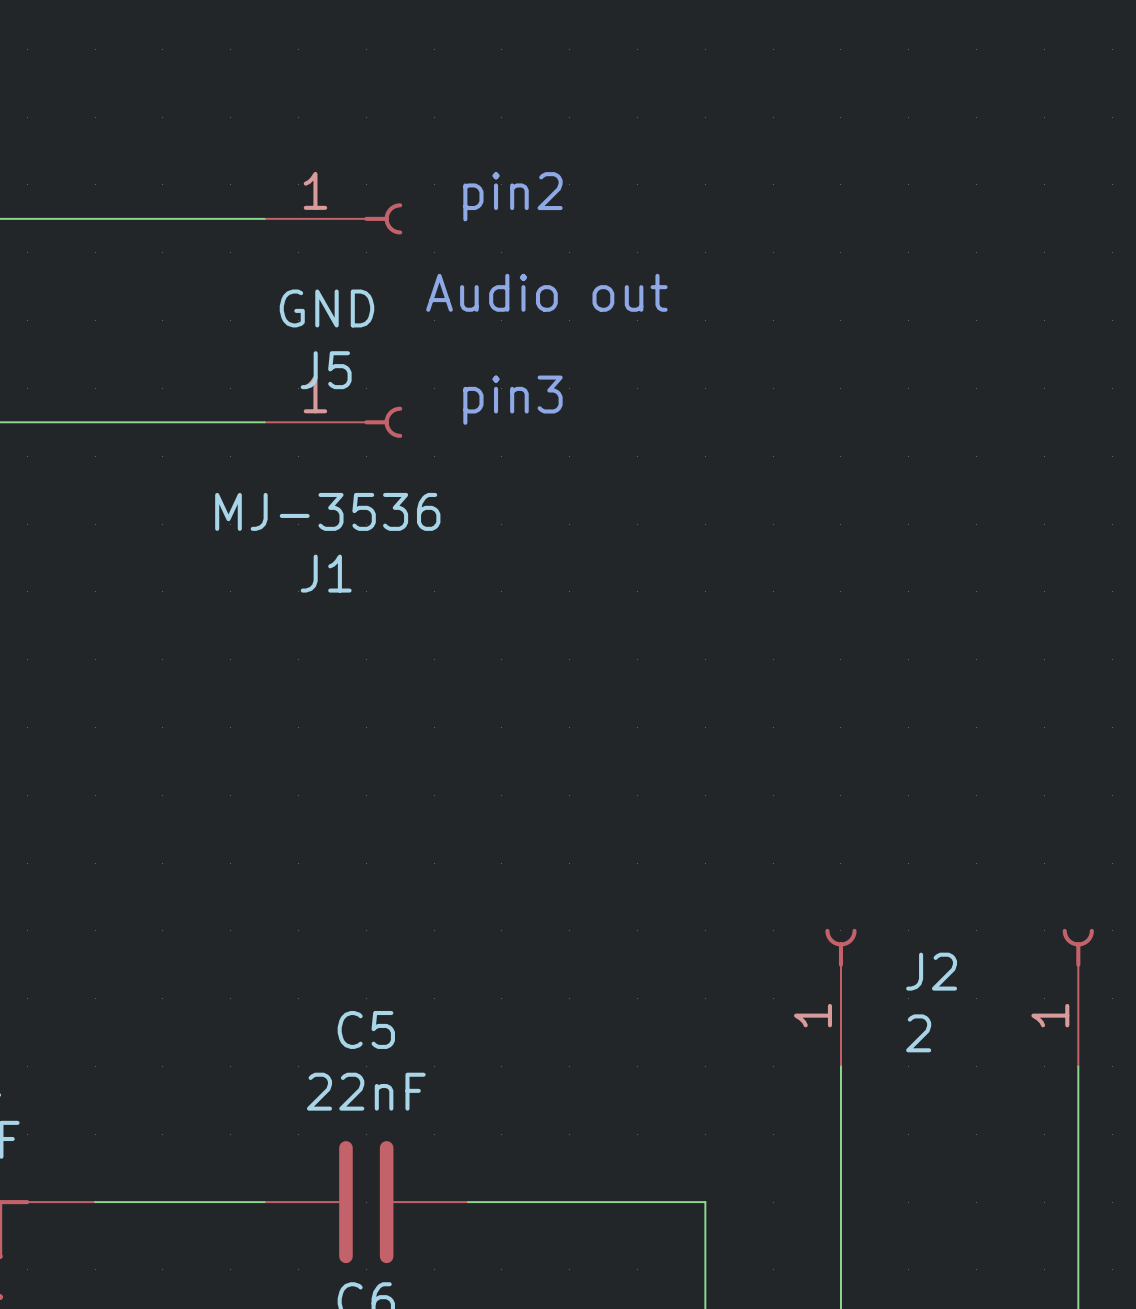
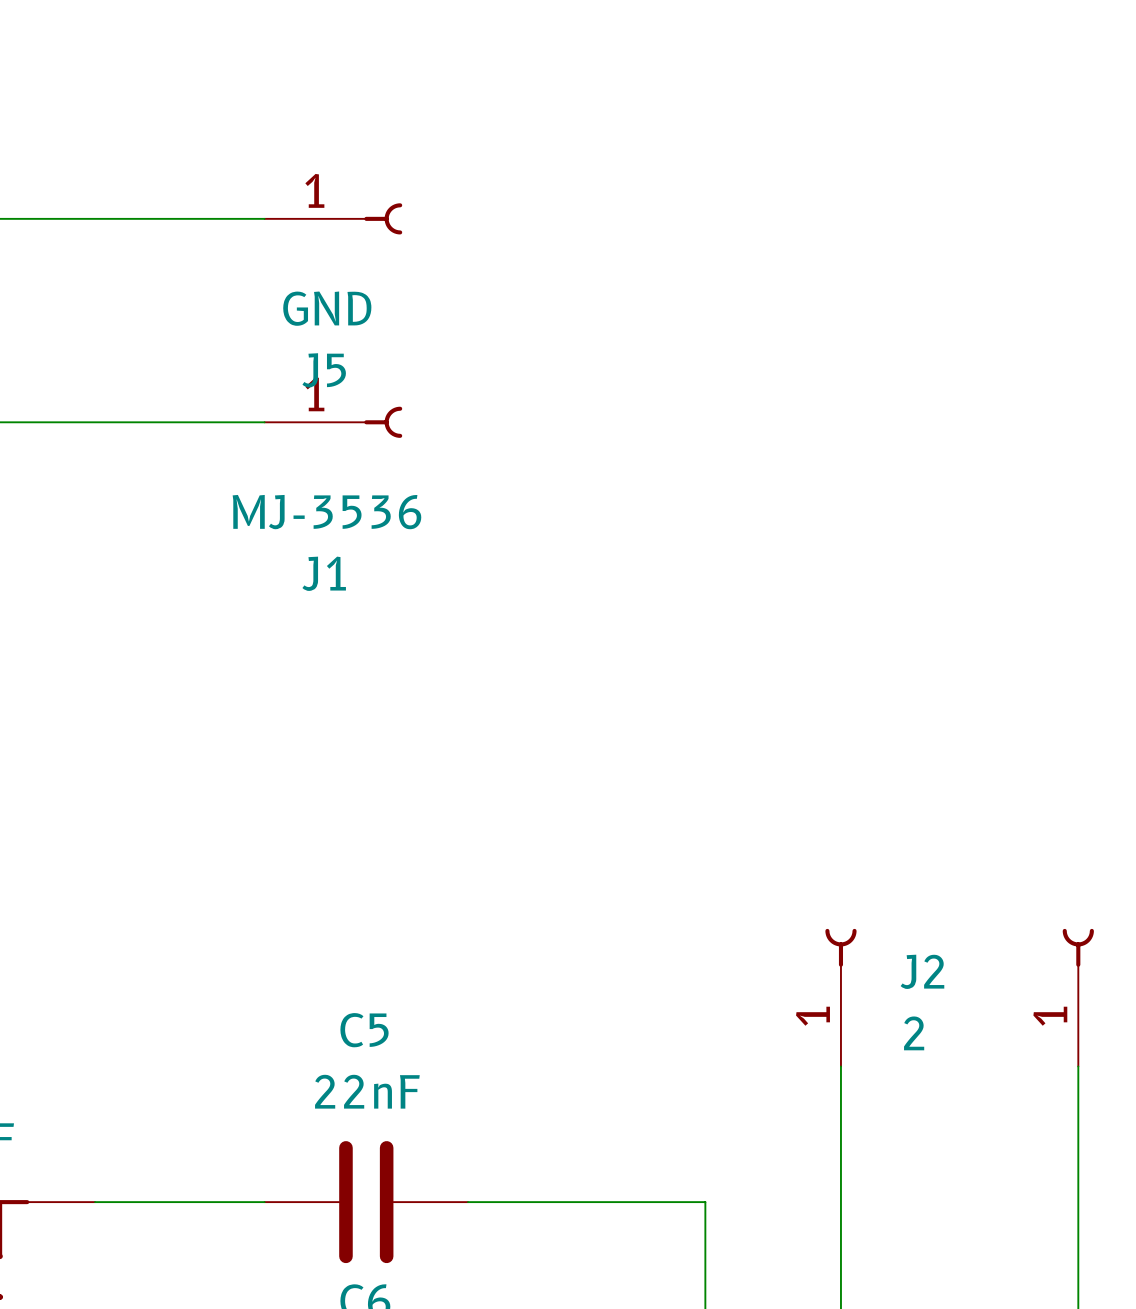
text: pin2 (512, 196) -> none
text: Audio out (546, 292) -> none
text: pin3 (512, 400) -> none

